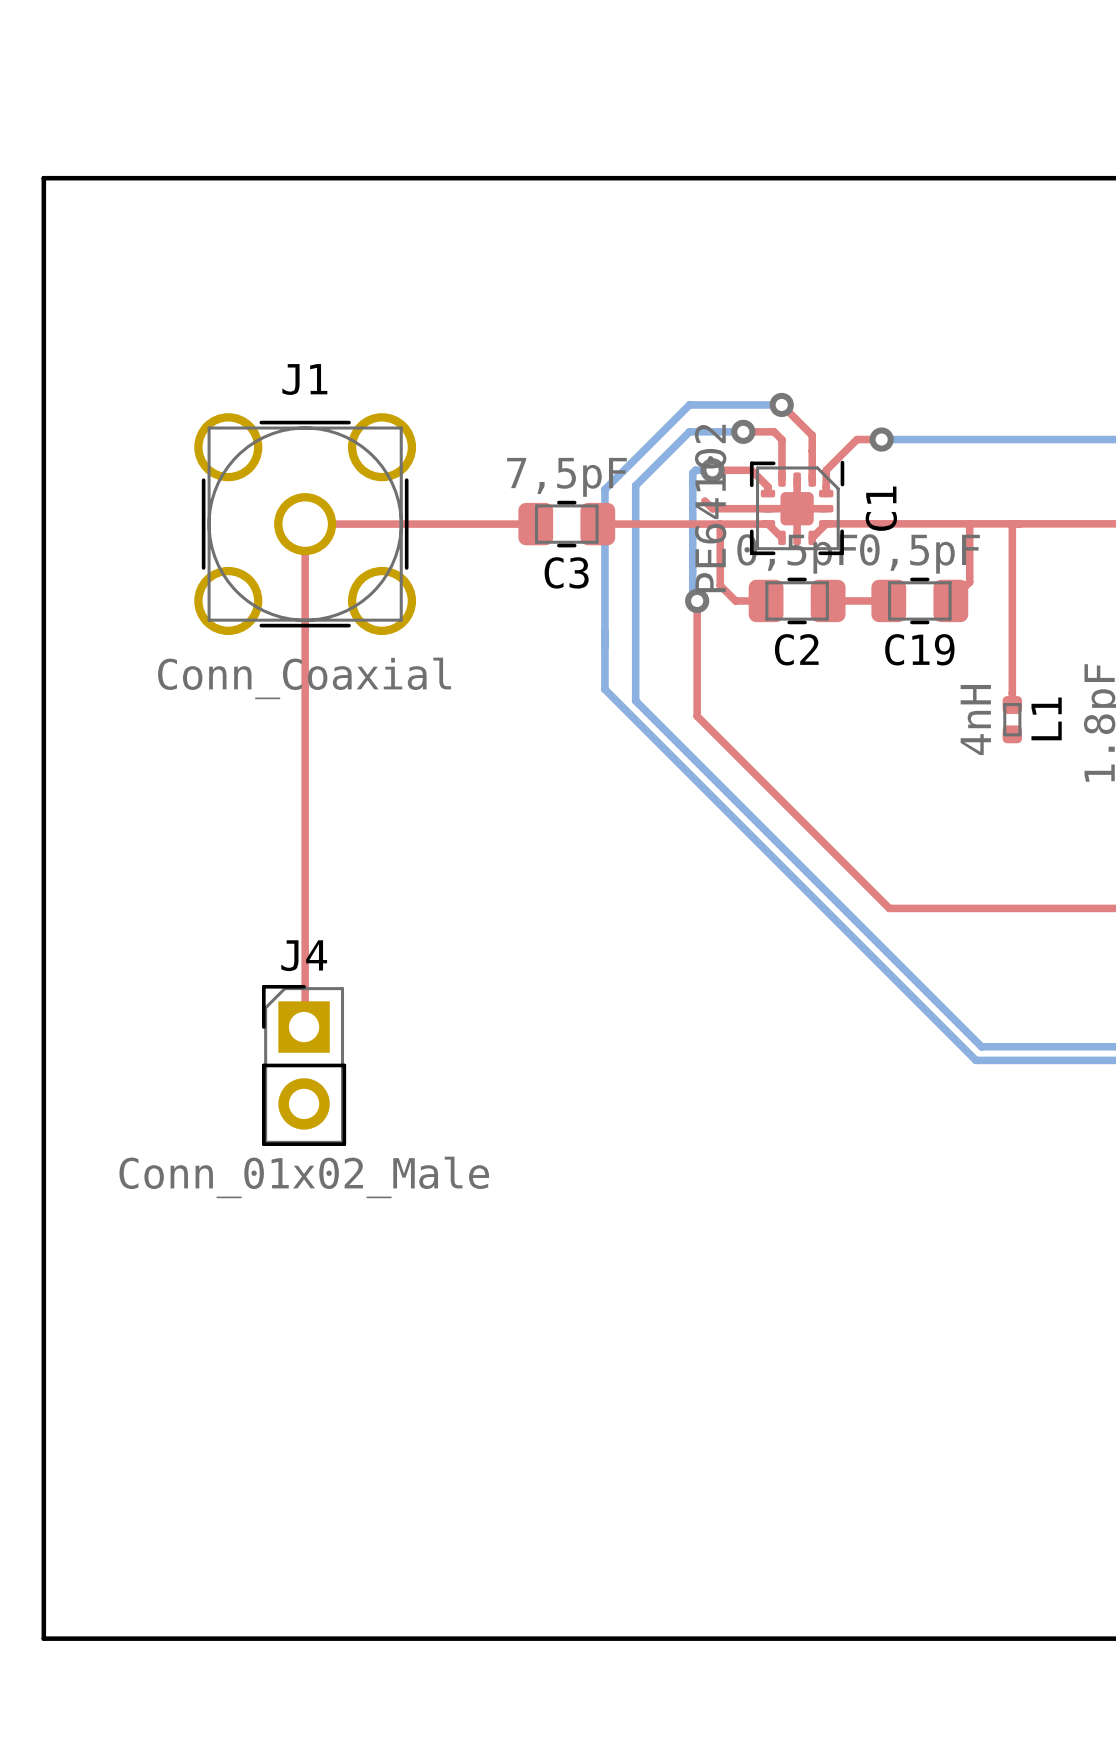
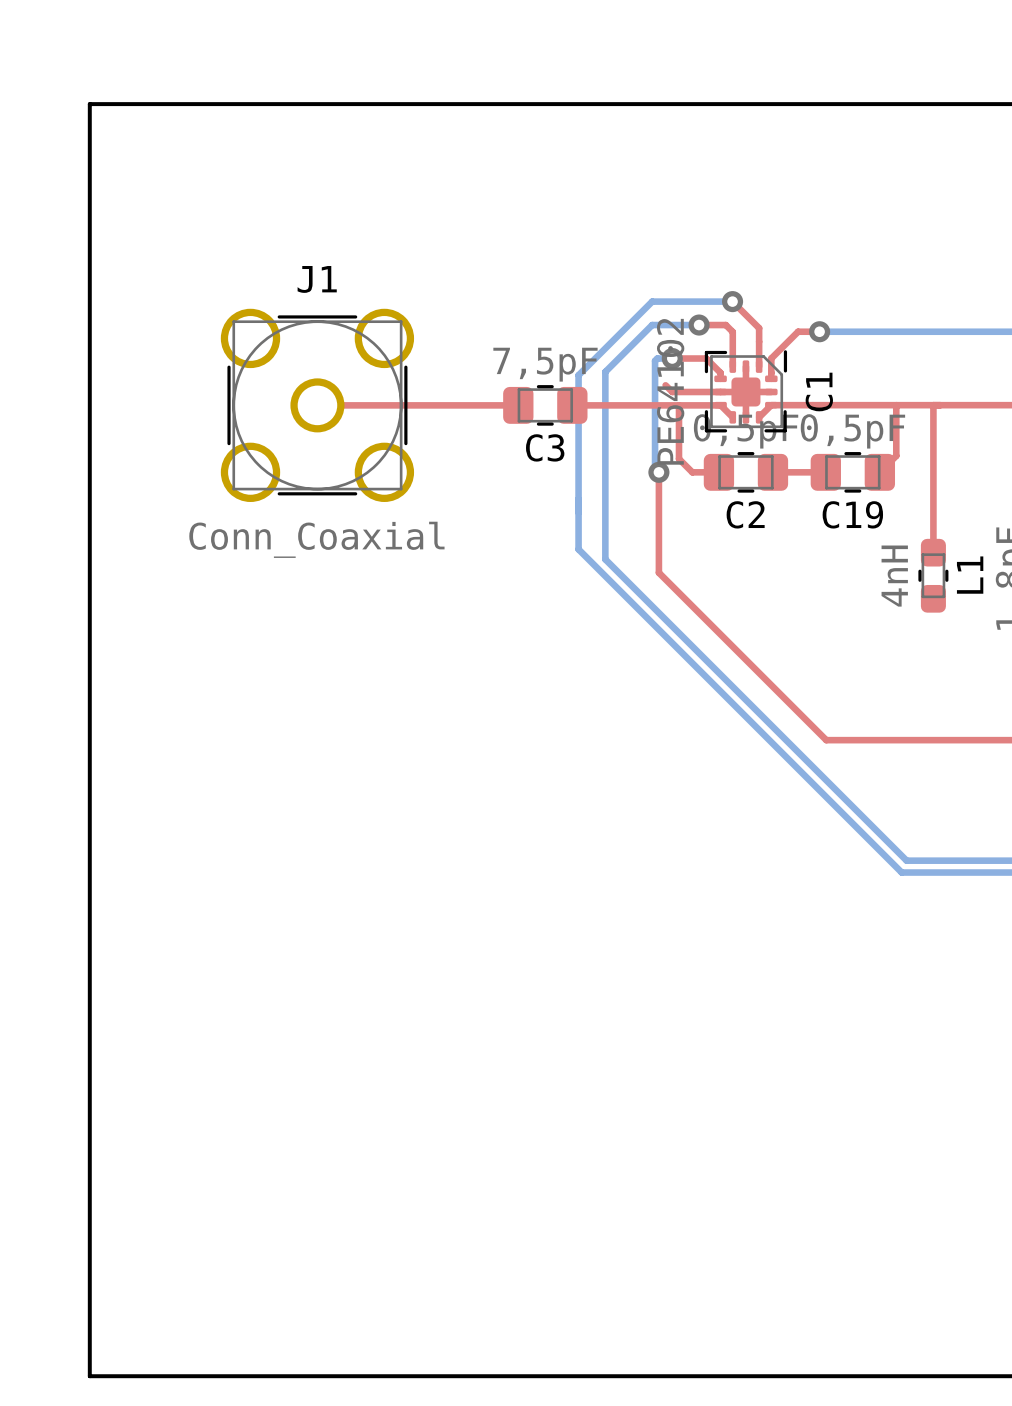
top track: (305, 524) (304, 1027) -> none
L1 footprint: [1002, 696, 1023, 744] -> [918, 538, 949, 613]
J4: Conn_01x02_Male (304, 1065) -> none

